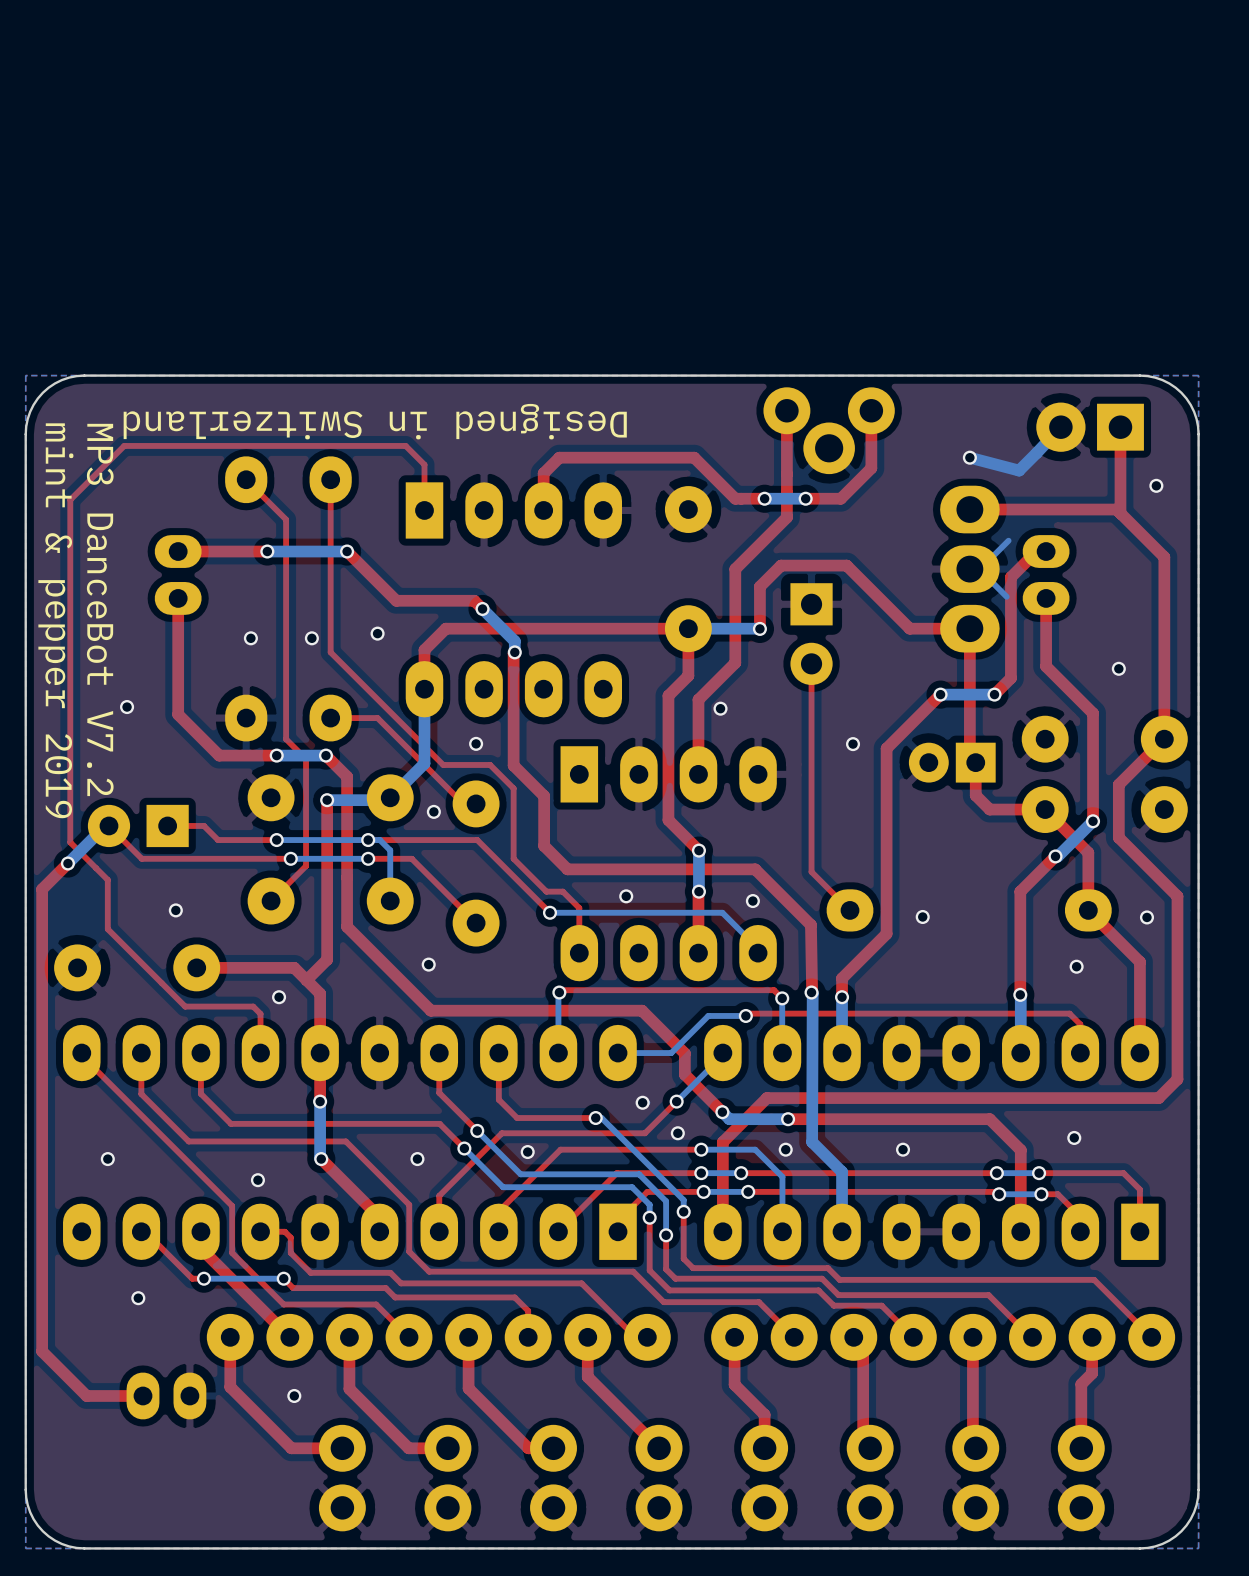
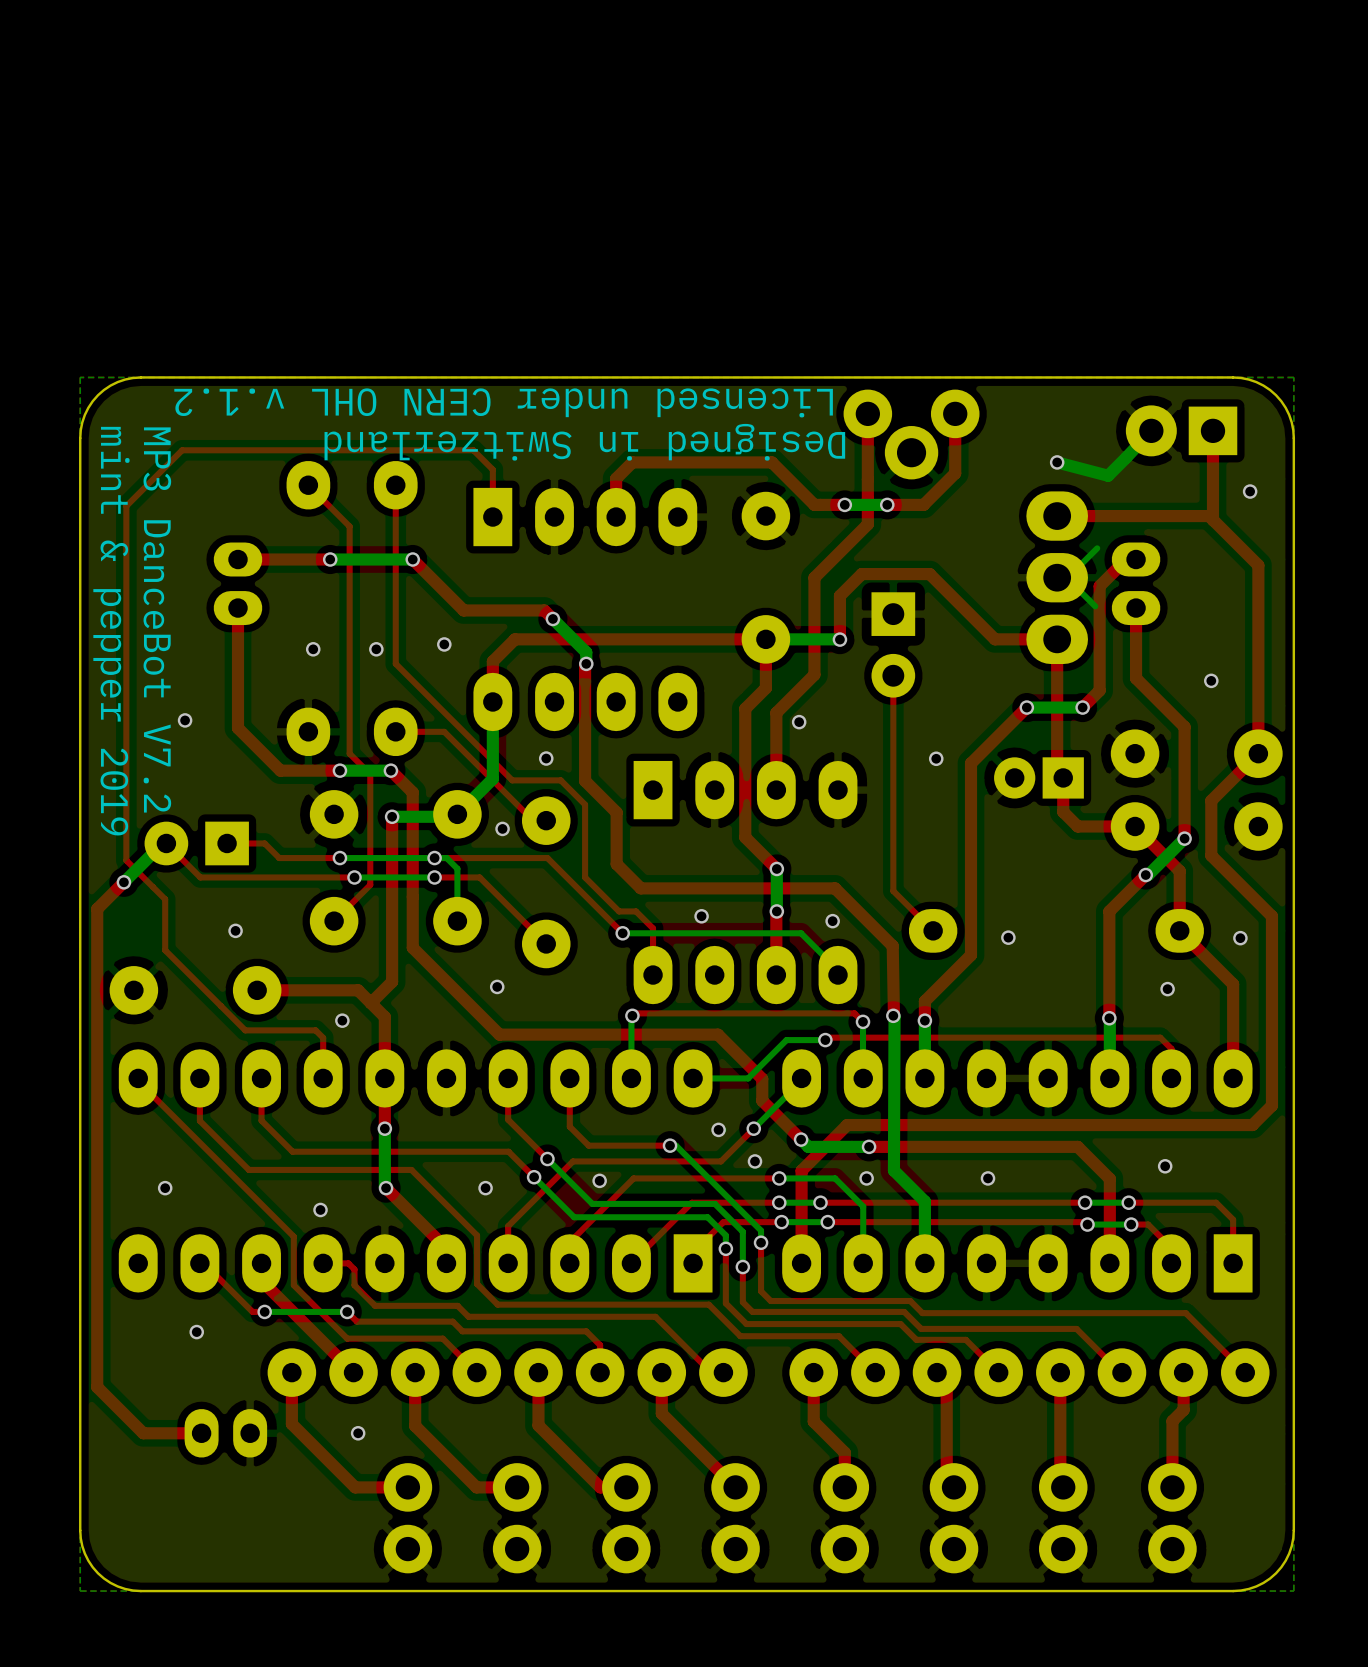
text: none -> Licensed under CERN OHL v.1.2 (503, 402)
text position: Designed in Switzerland (375, 421) -> Designed in Switzerland (584, 442)

